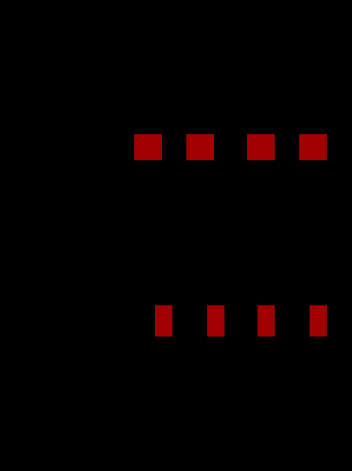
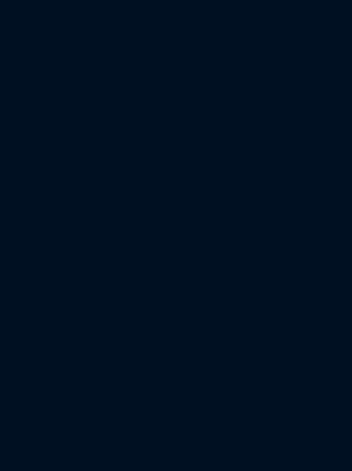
part: (174, 147) -> none
part: (287, 147) -> none
part: (189, 320) -> none
part: (292, 320) -> none

